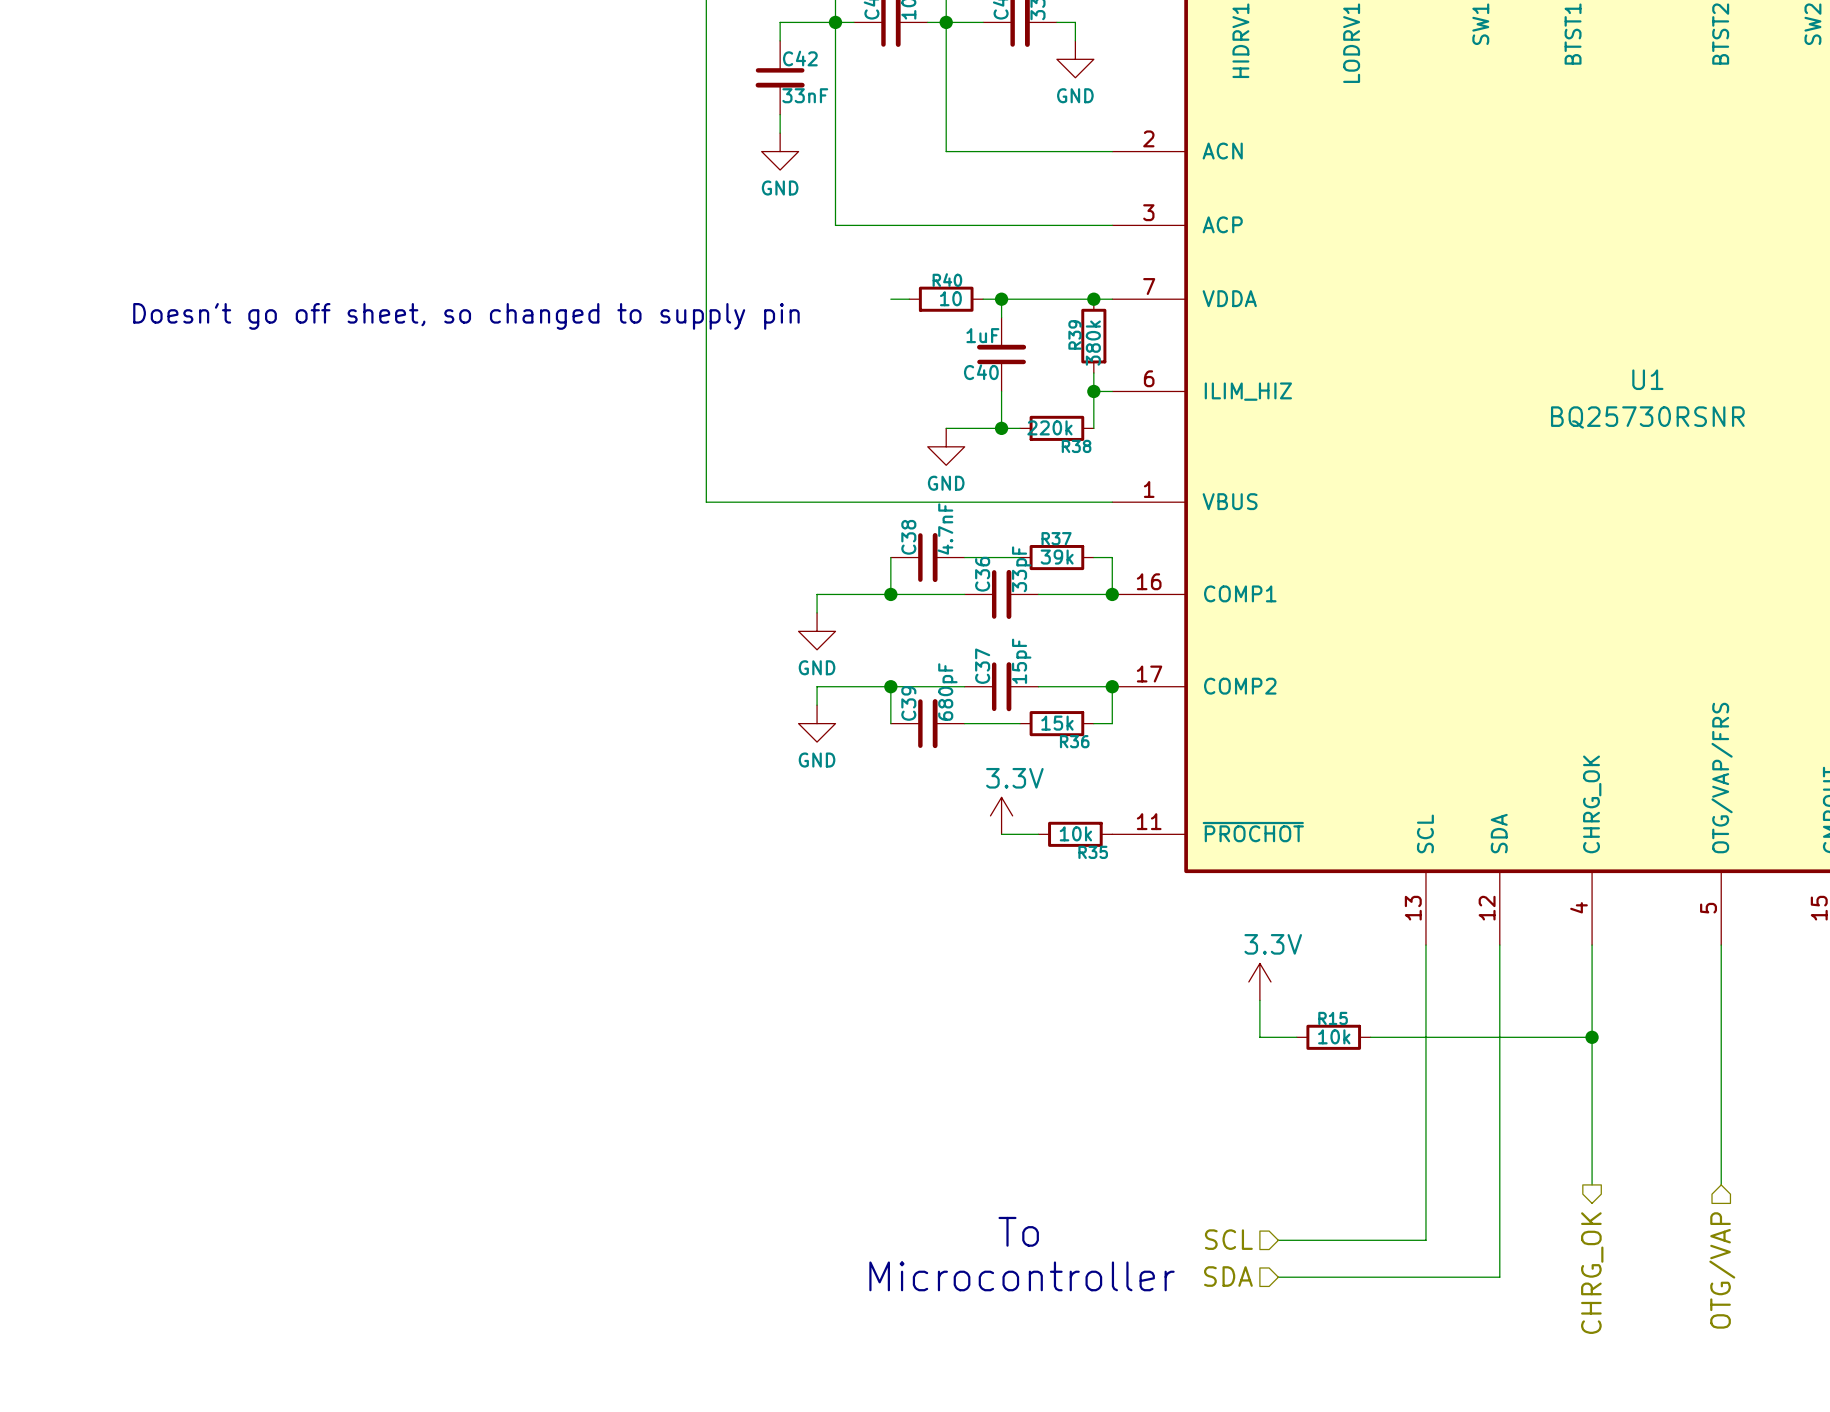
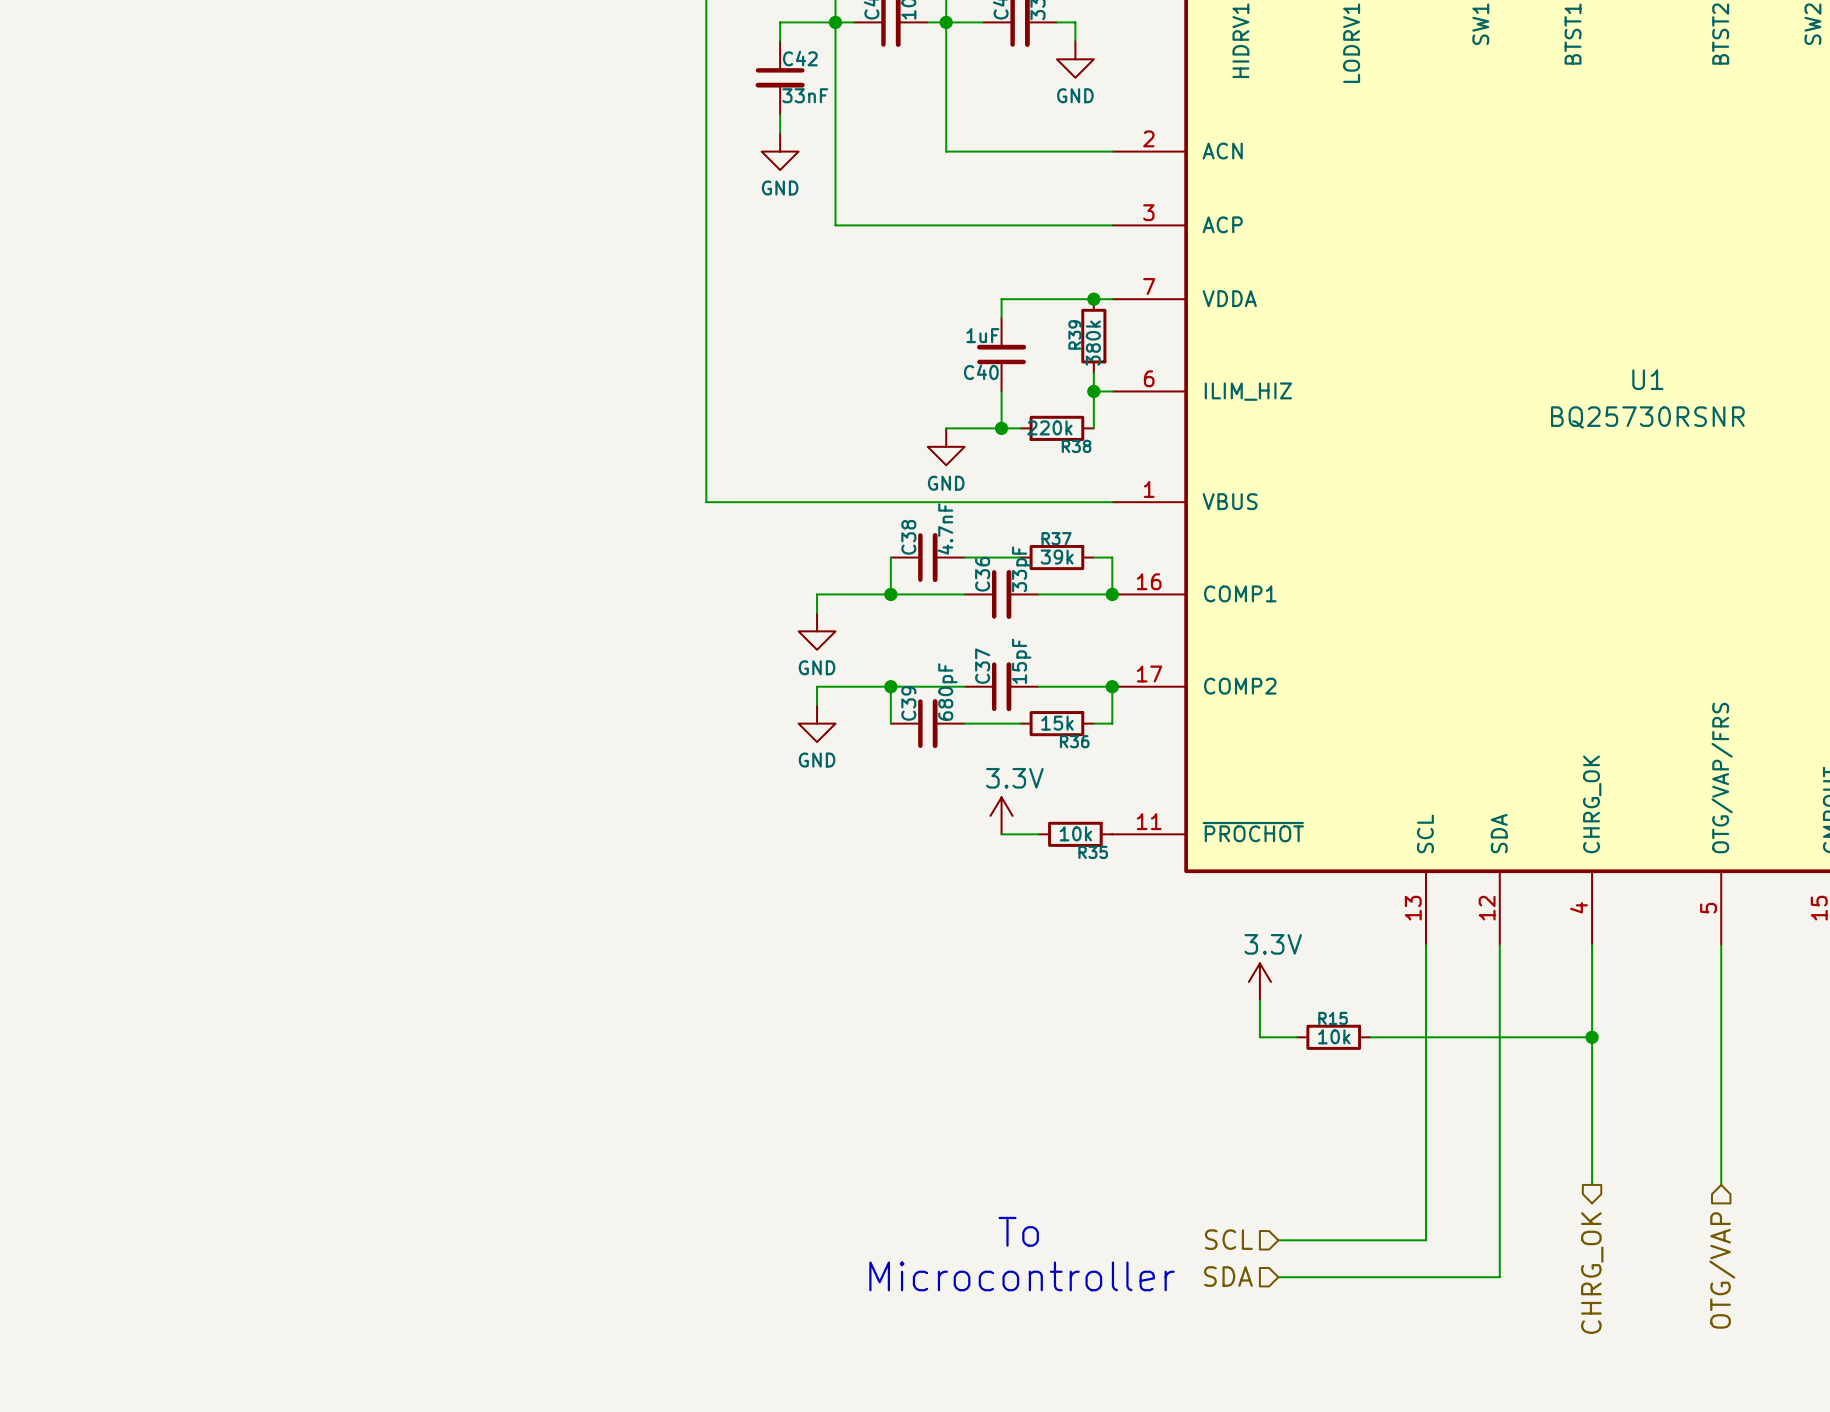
wire: (890, 299) (909, 299) -> none
R40: 10 (946, 299) -> none
wire: (983, 299) (1001, 299) -> none
junction: (1001, 299) -> none
text: Doesn't go off sheet, so changed to supply pin (466, 316) -> none

